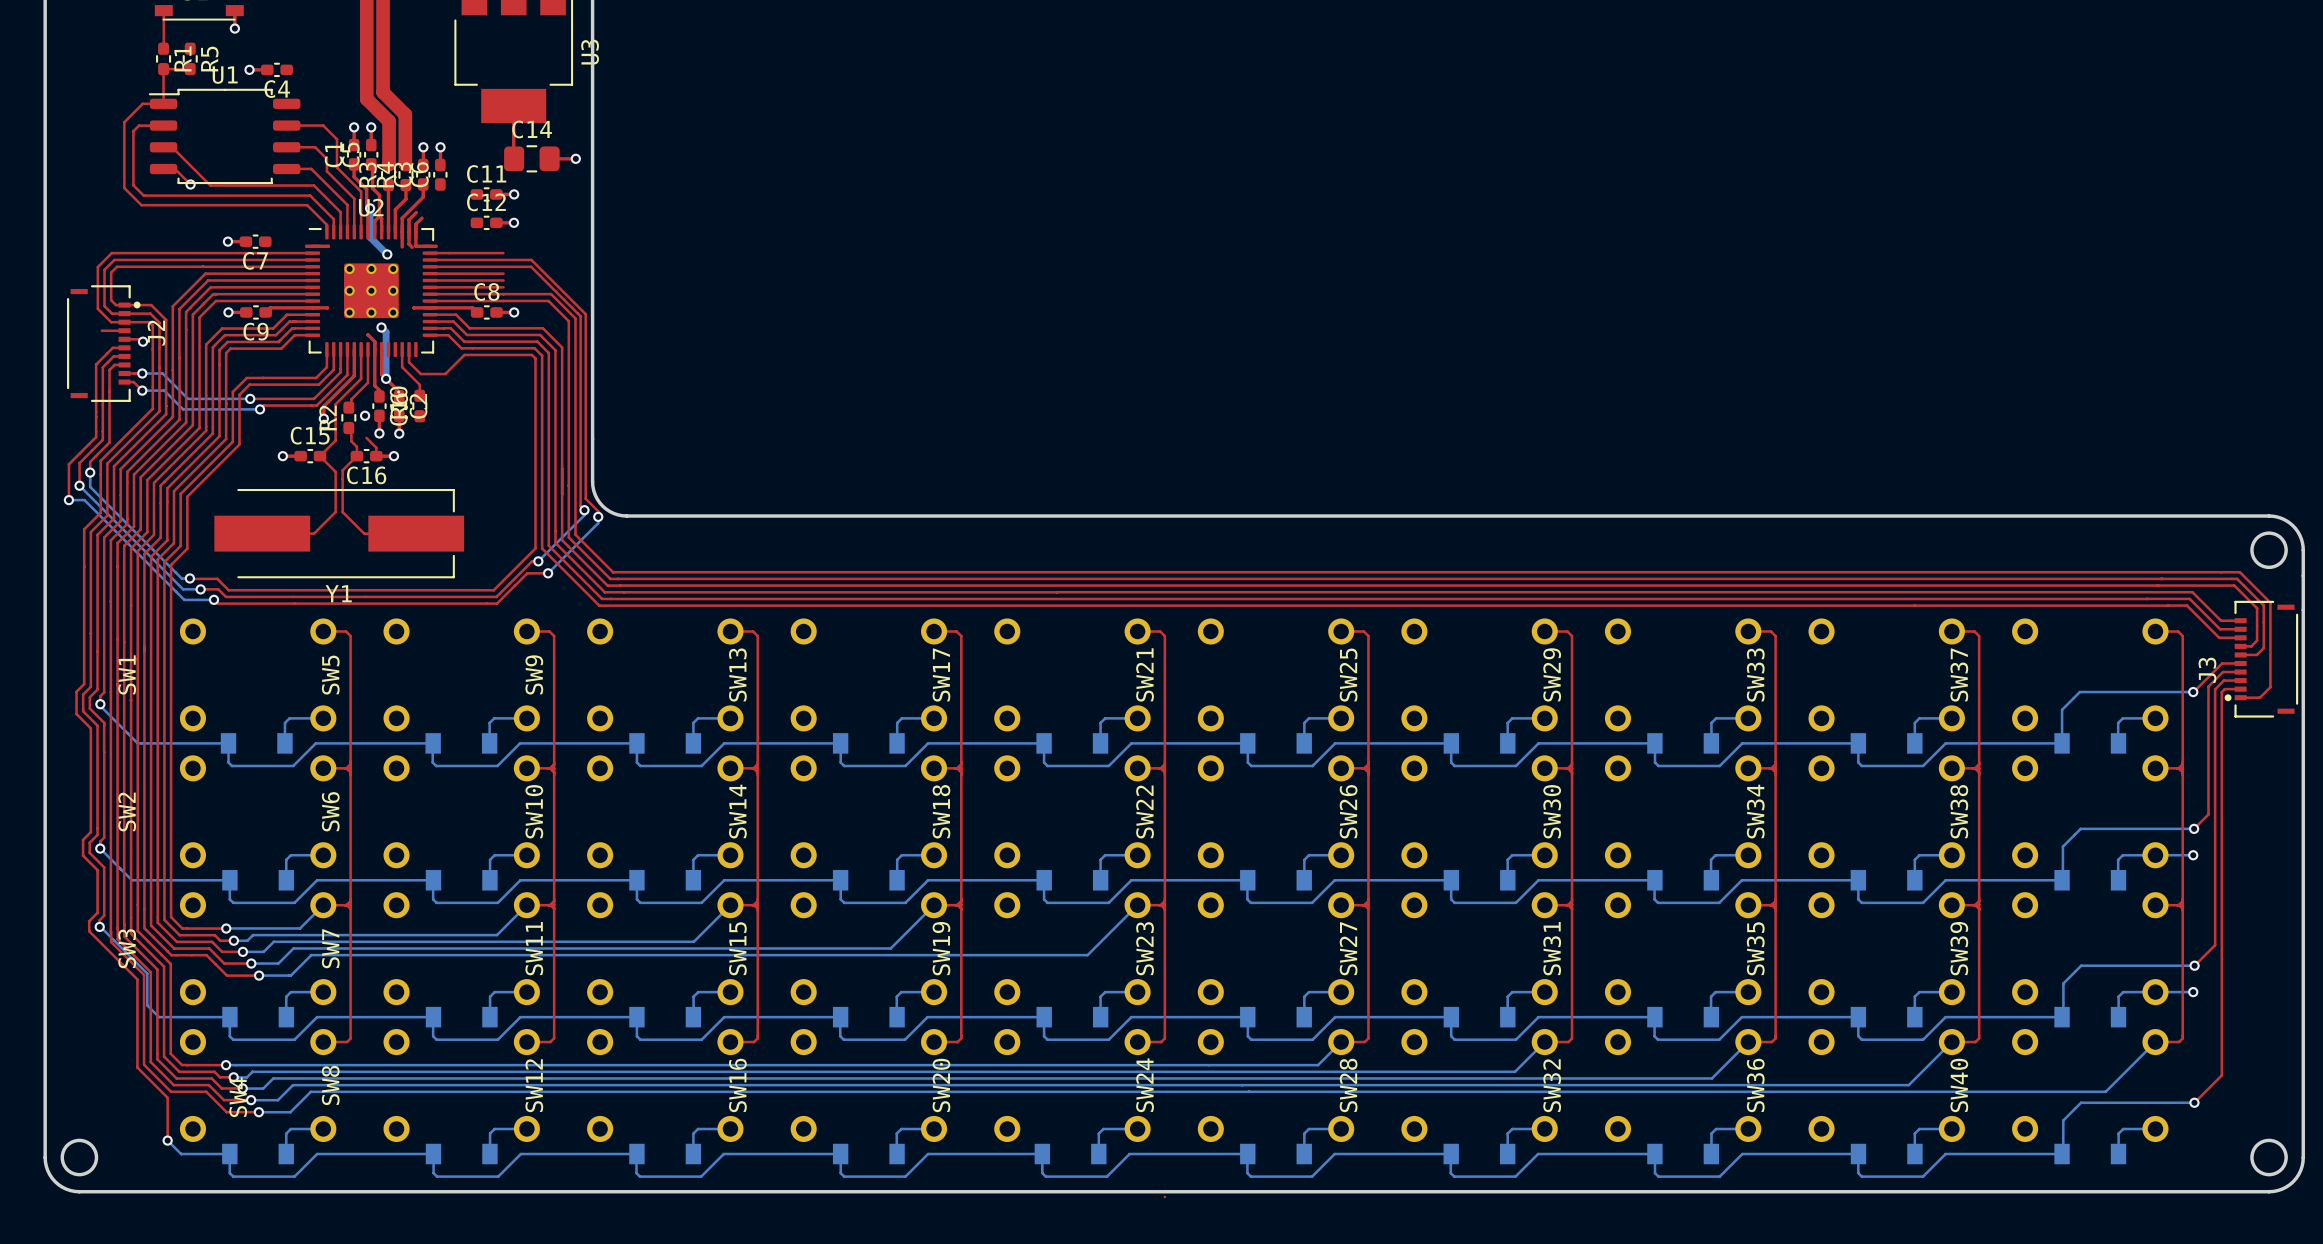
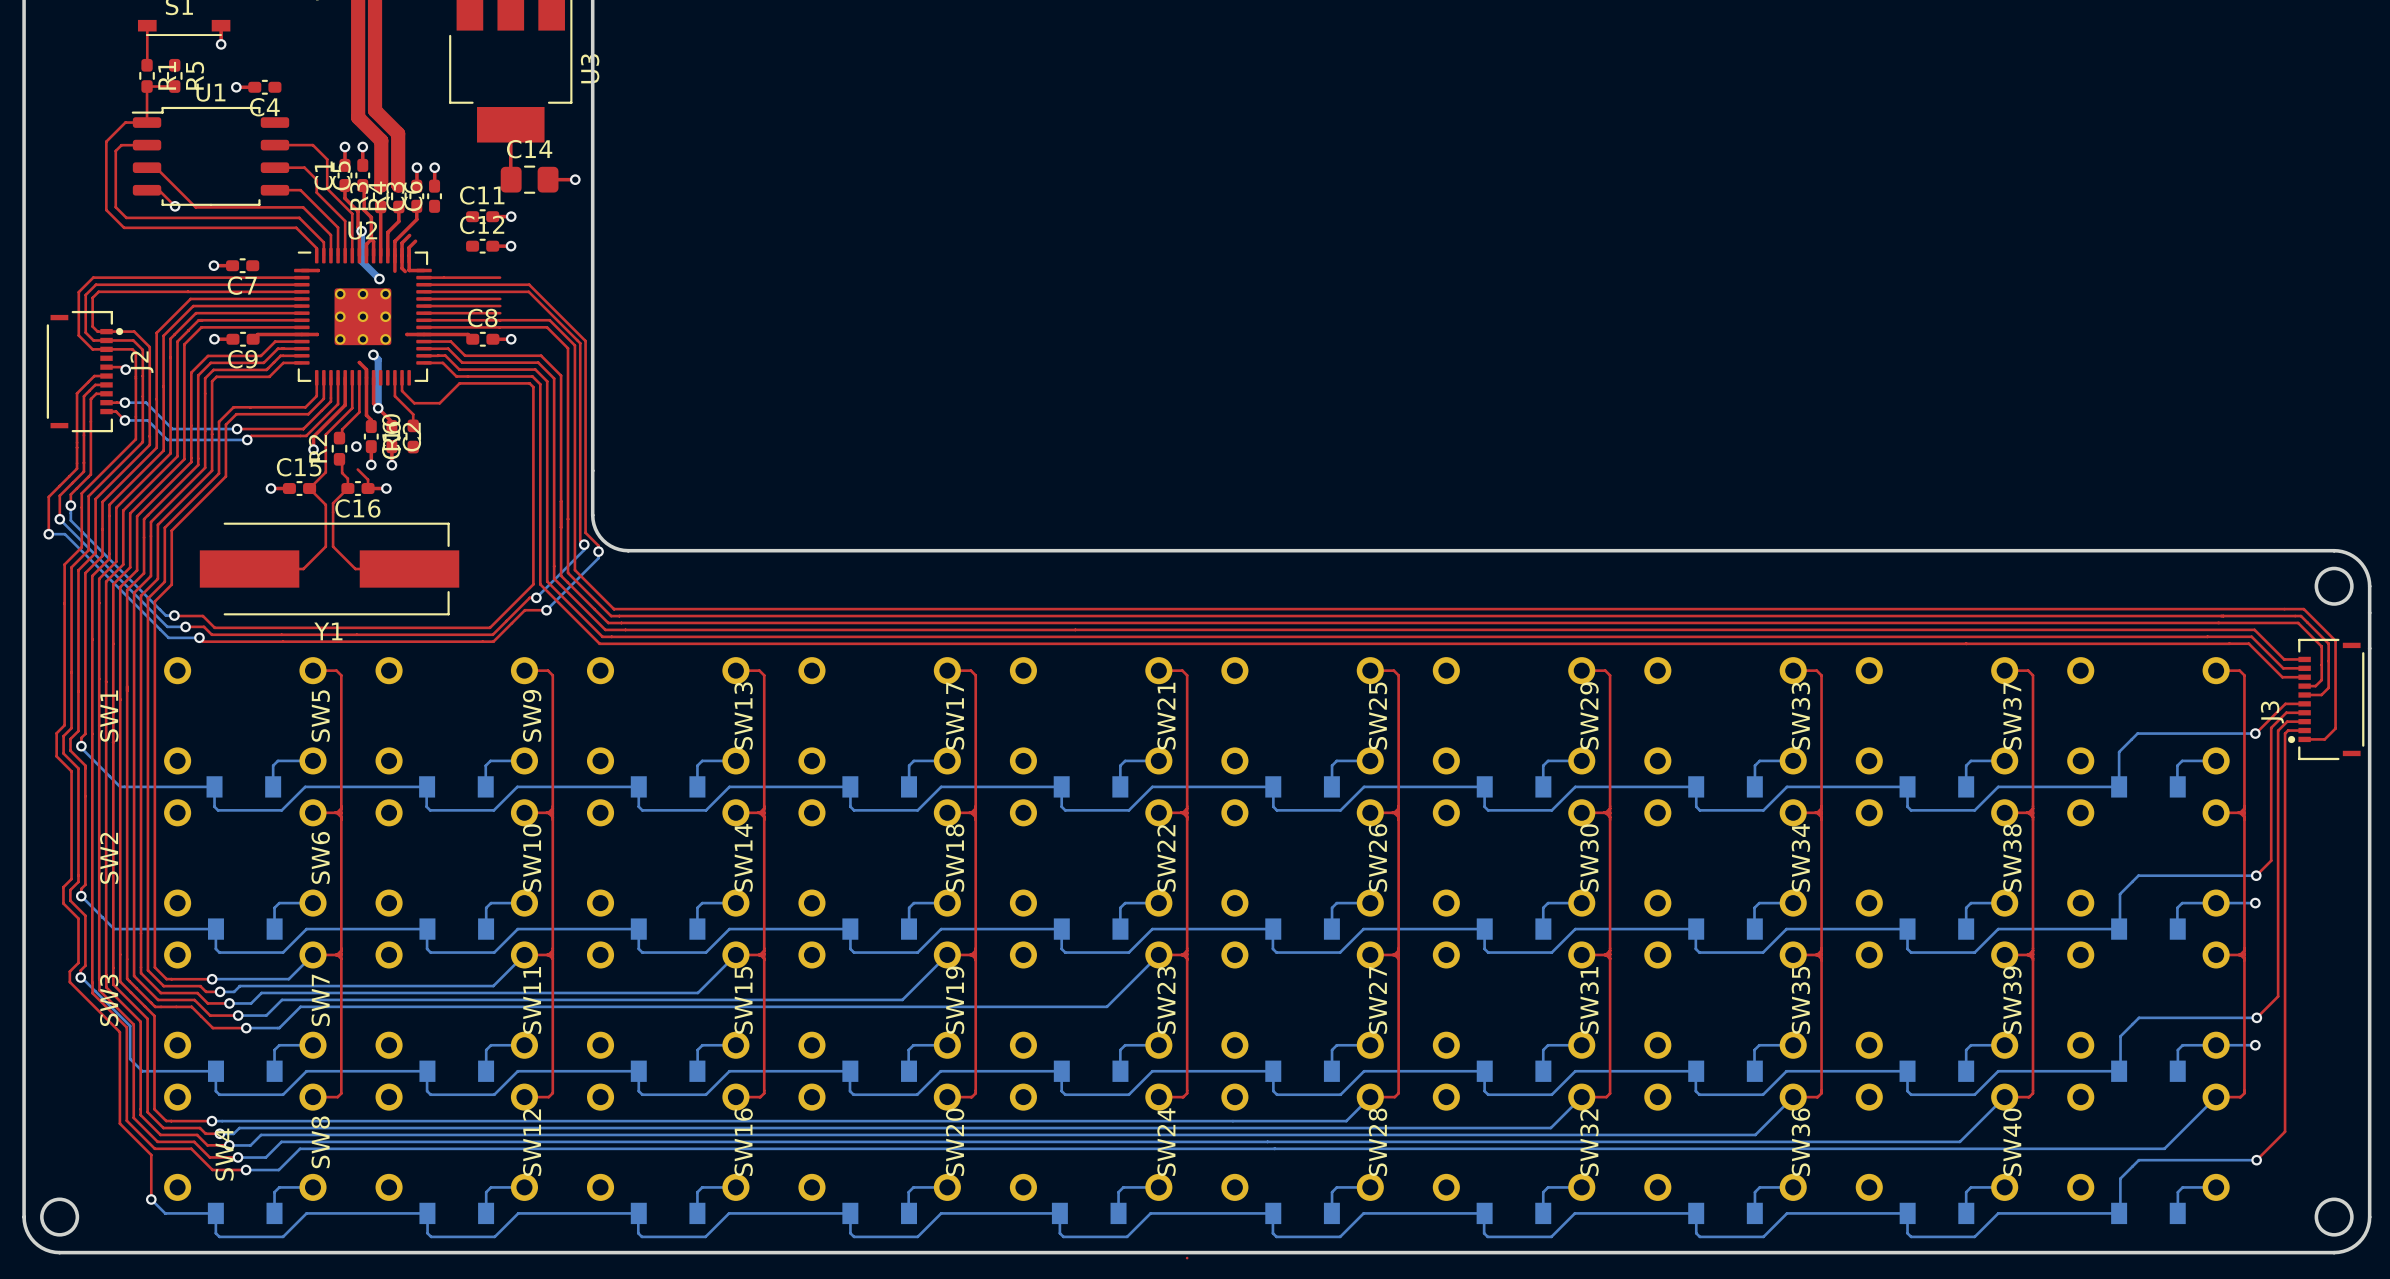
top track: (101, 330) (124, 330) -> none

